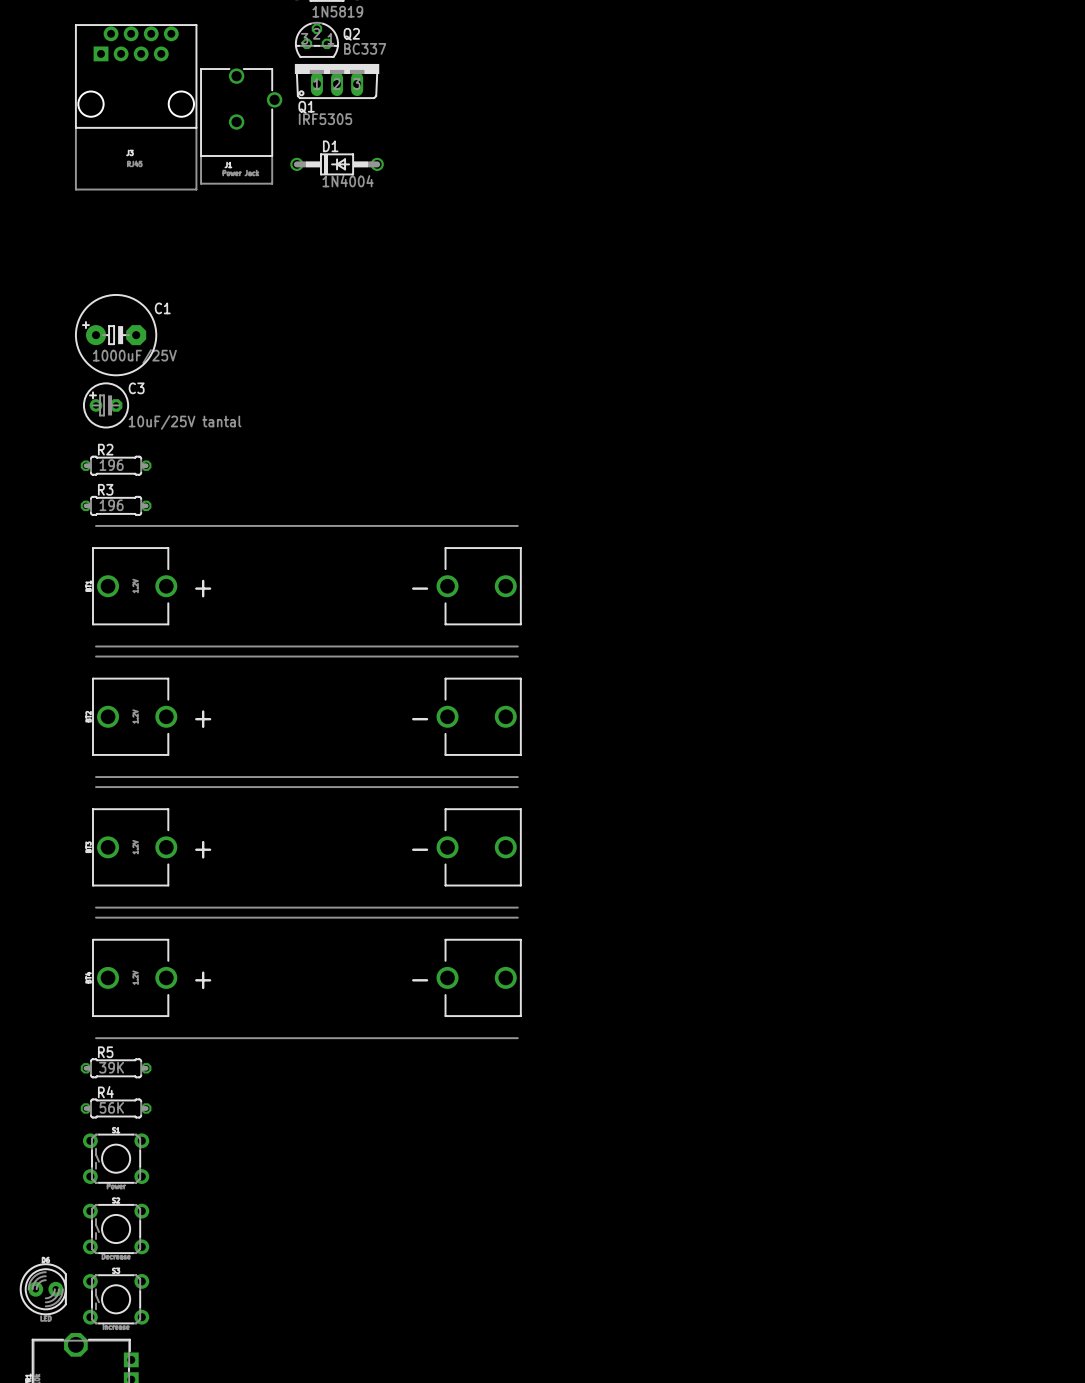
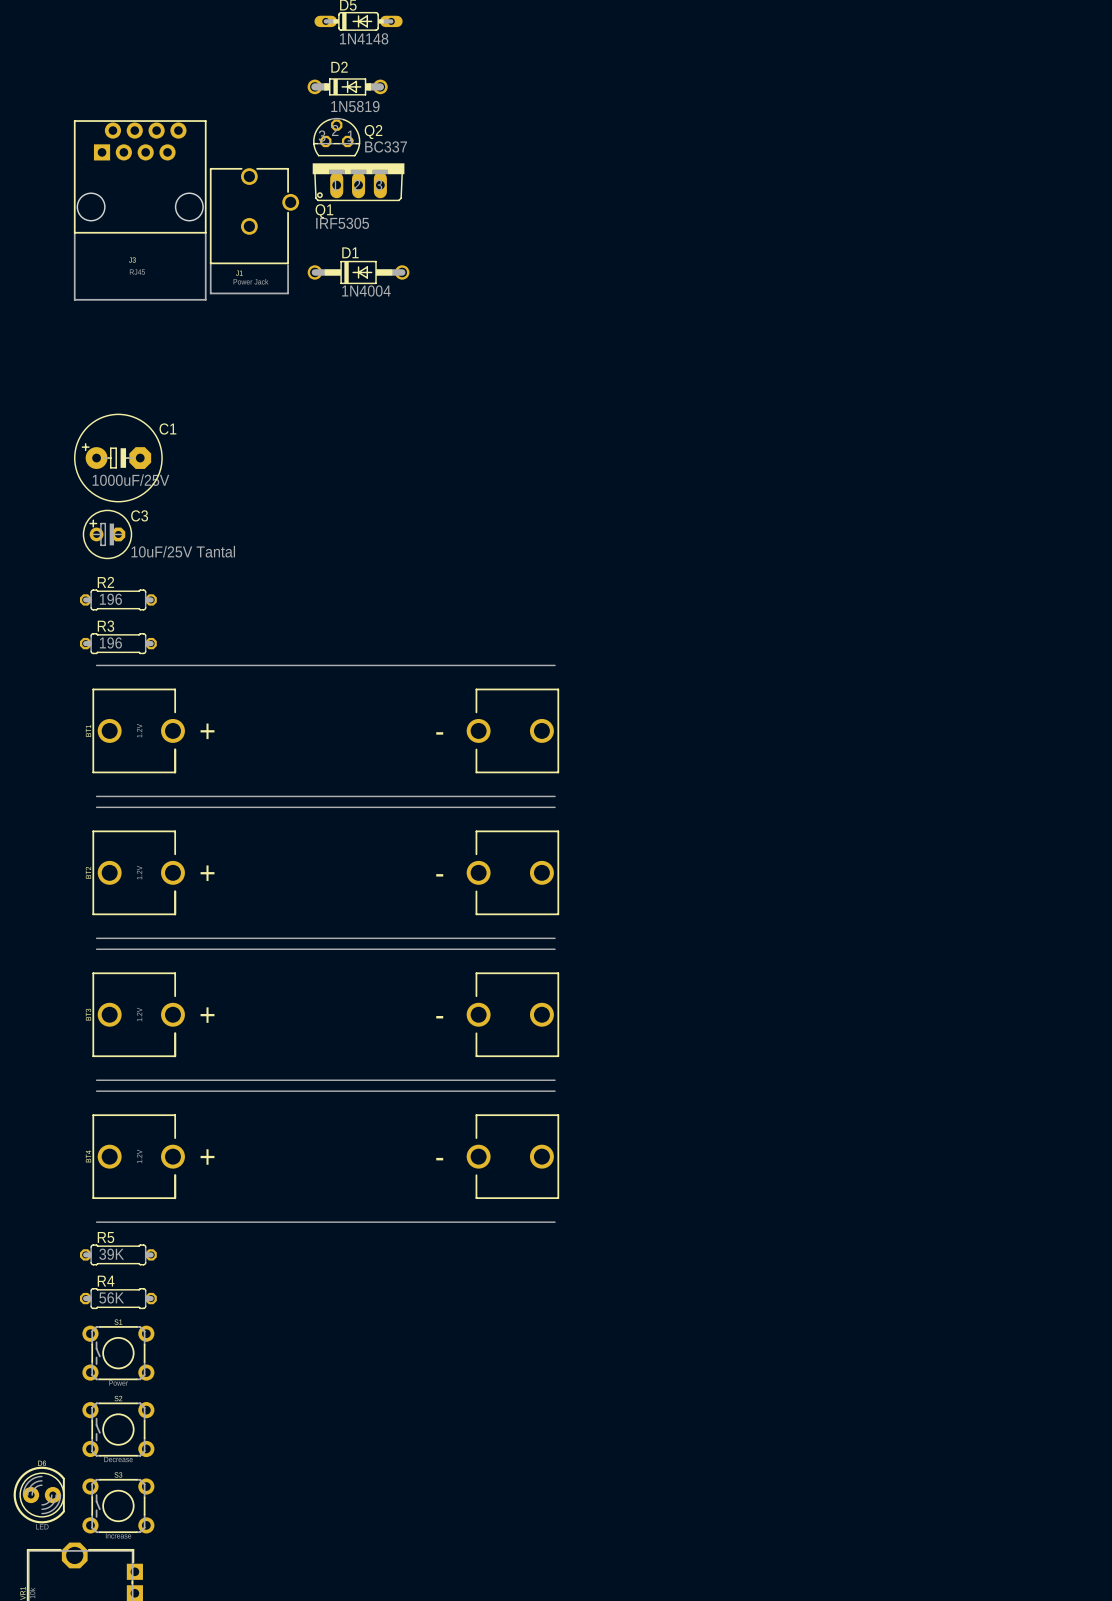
C3 value: 10uF/25V tantal (185, 422) -> 10uF/25V Tantal (183, 551)

